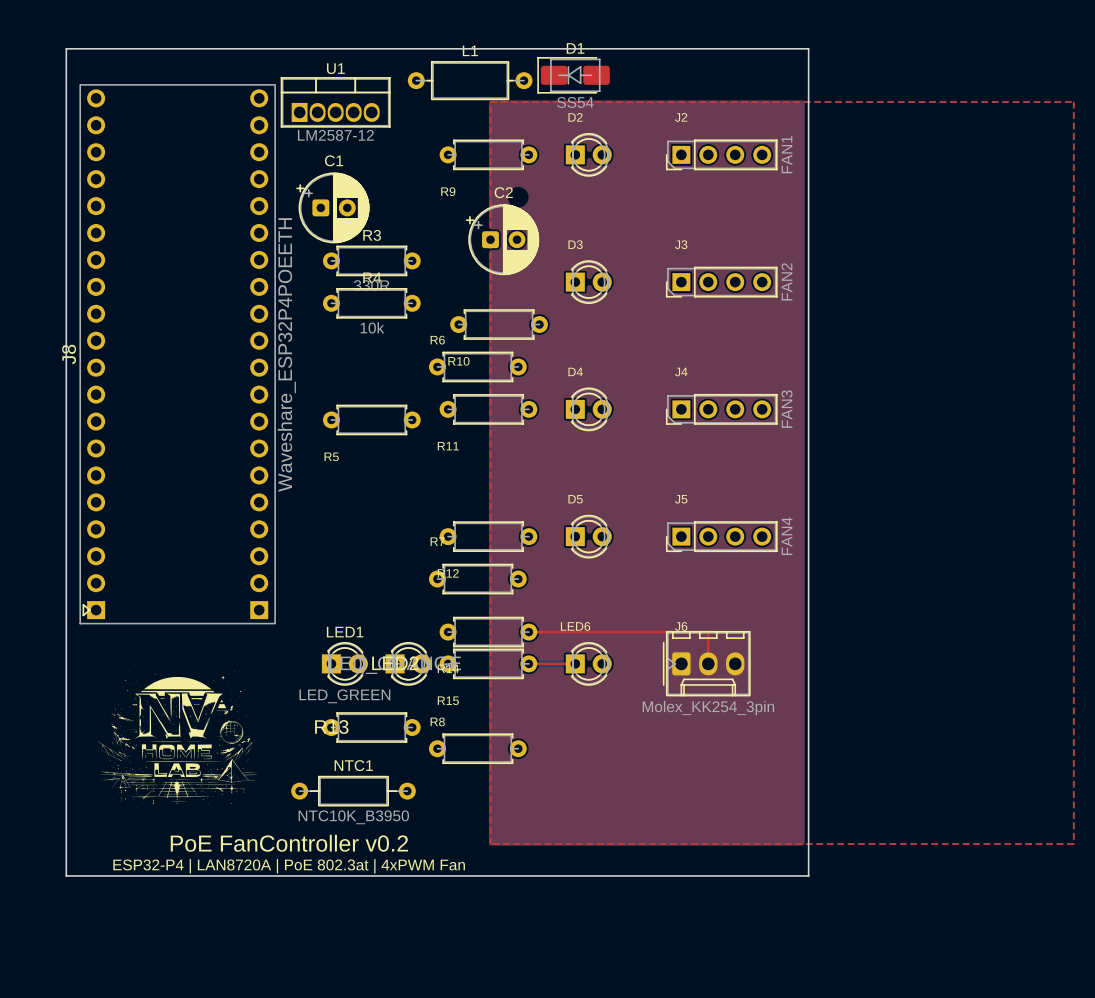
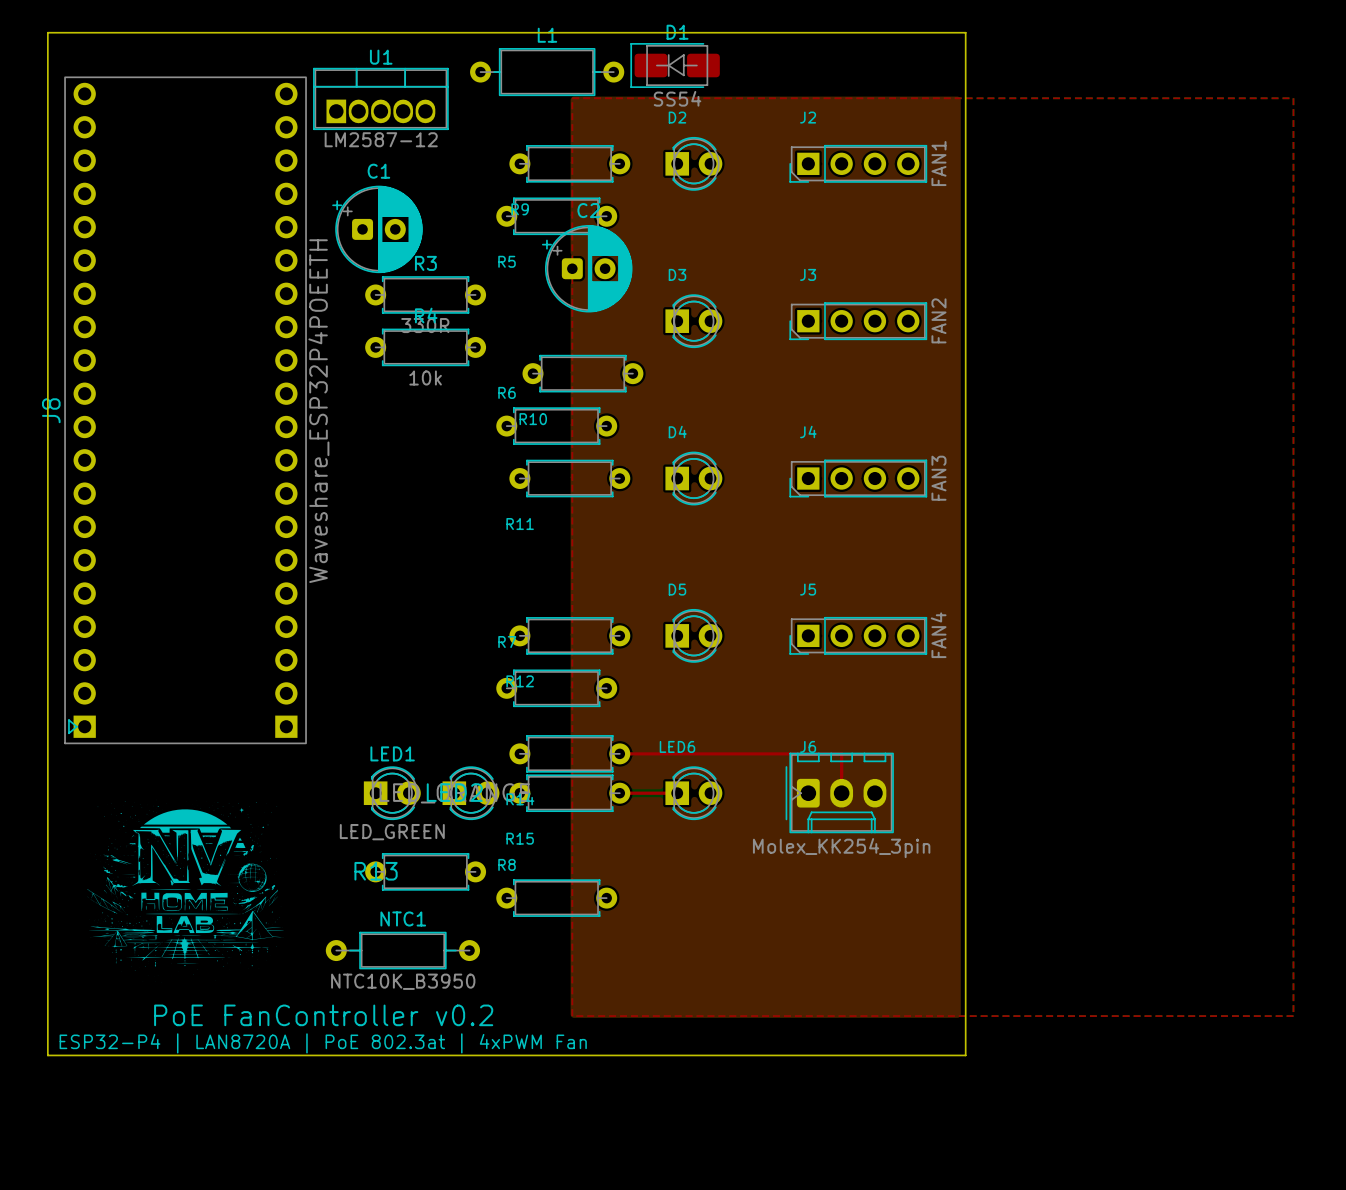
R5 position: (371, 419) -> (556, 216)

